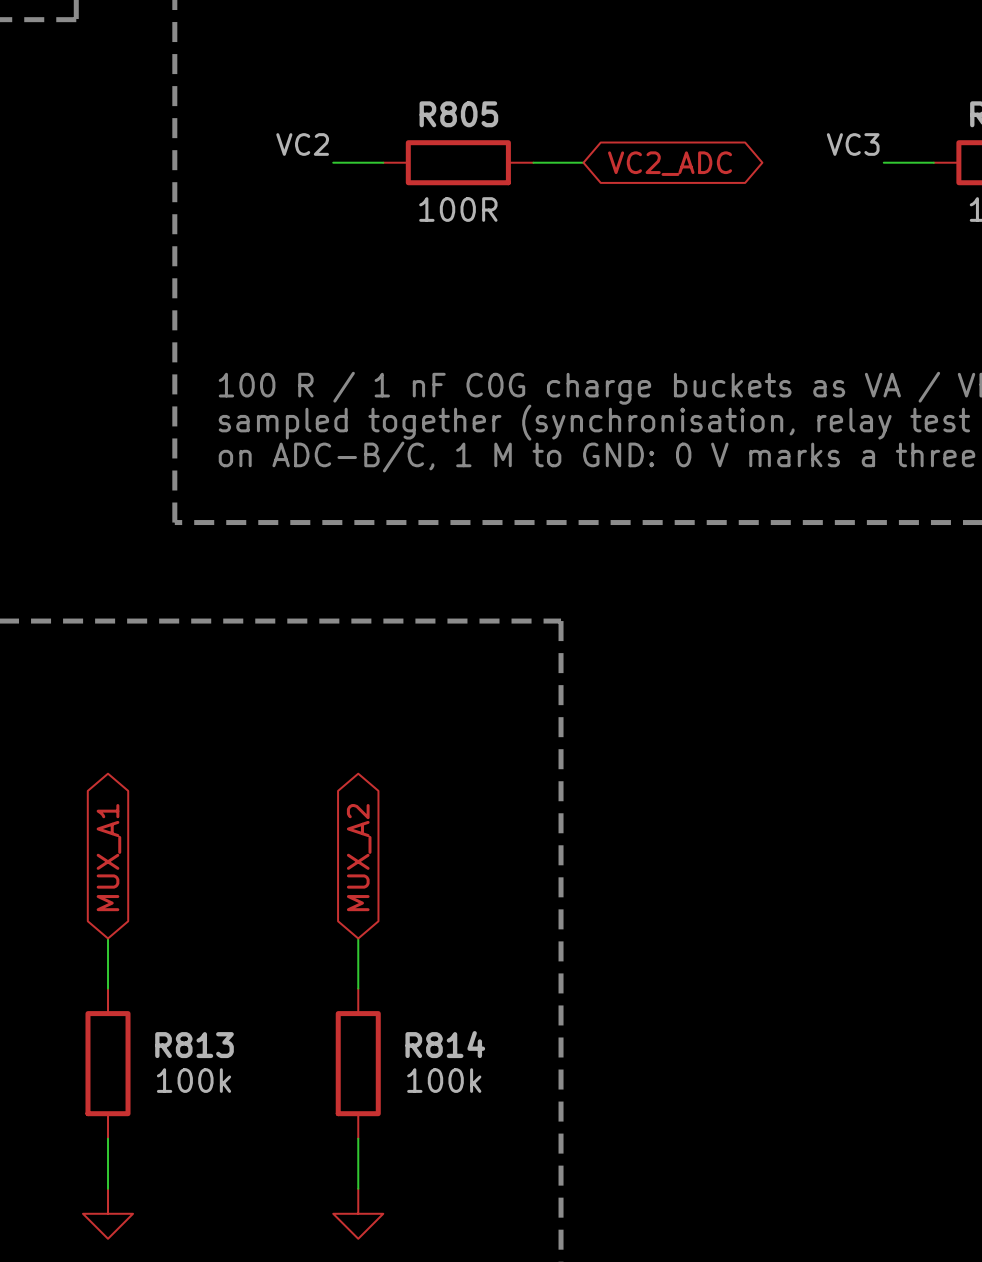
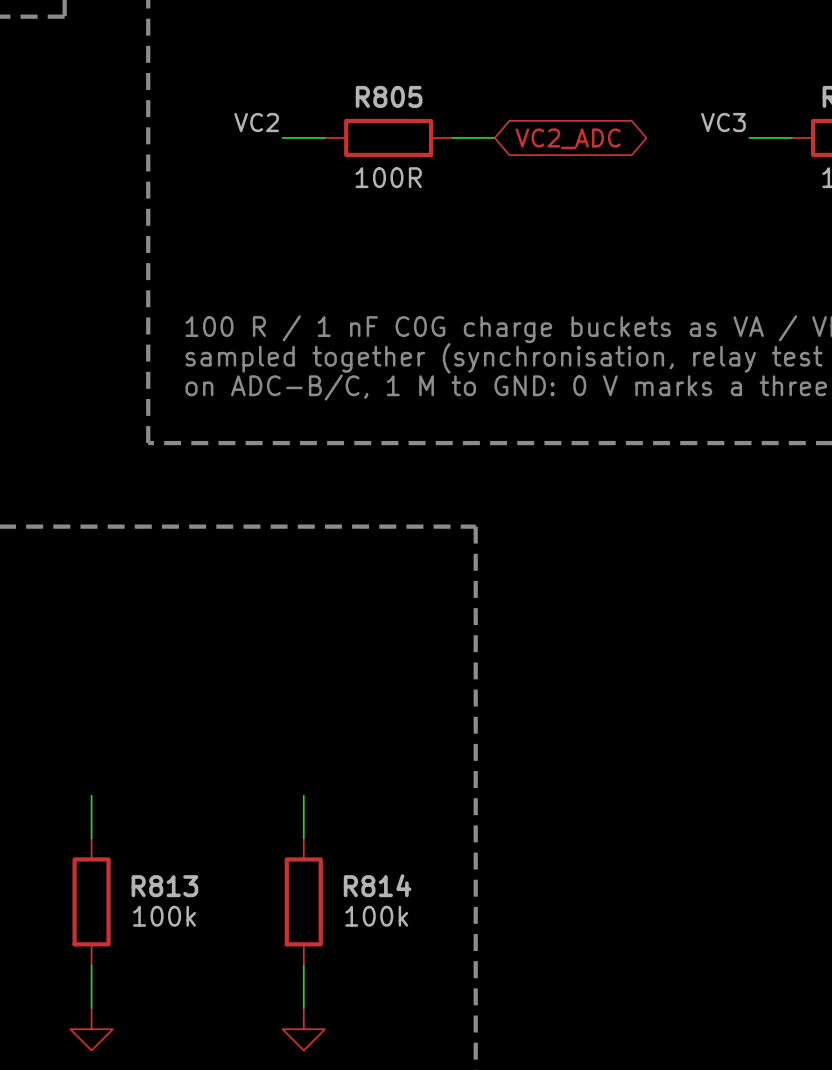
global label: MUX_A1 (108, 857) -> none
global label: MUX_A2 (359, 857) -> none

